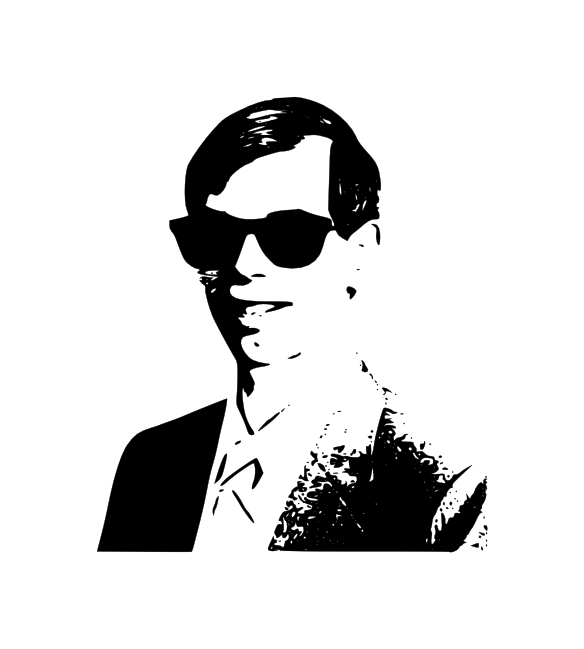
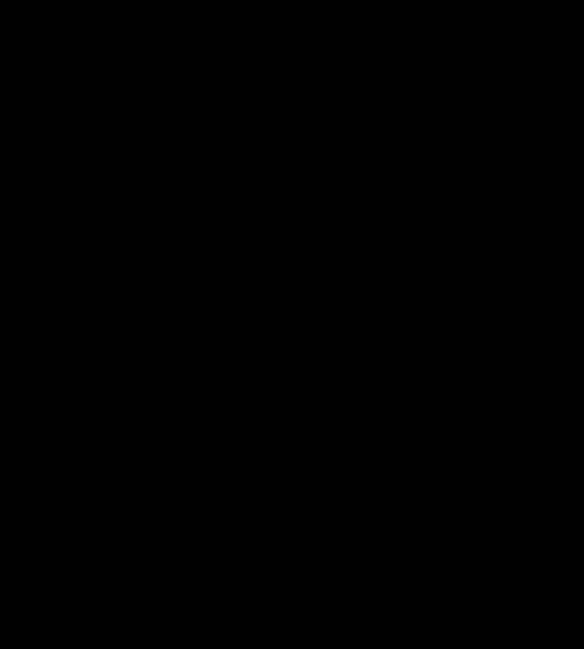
drawing: [96, 96, 488, 553] -> none

